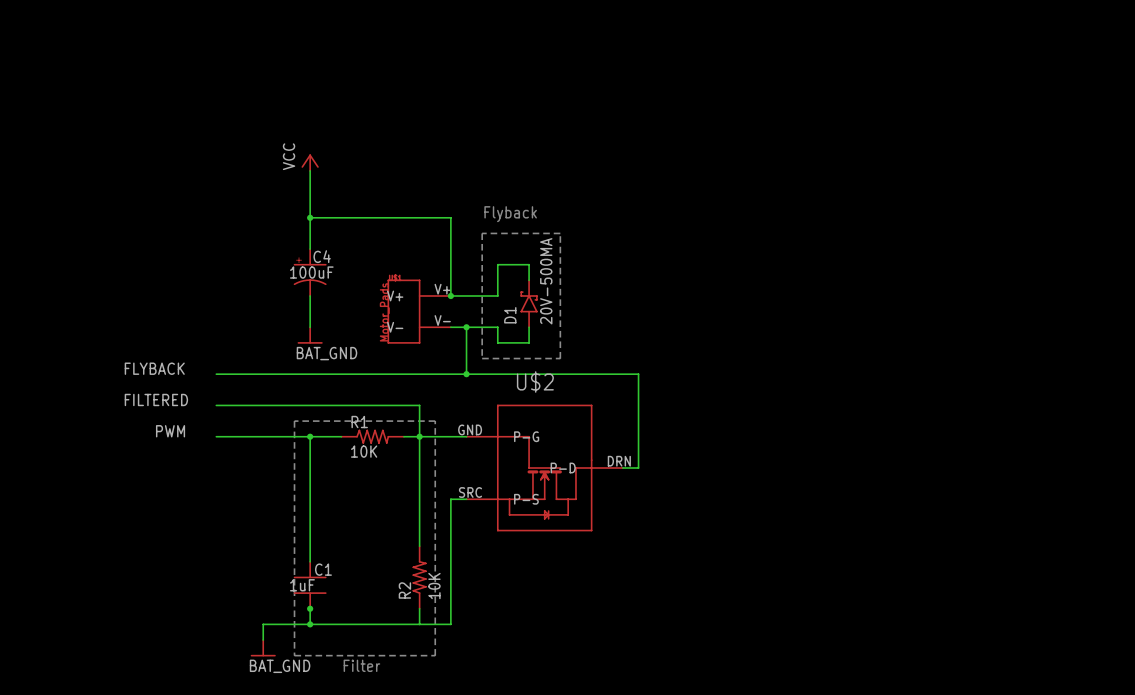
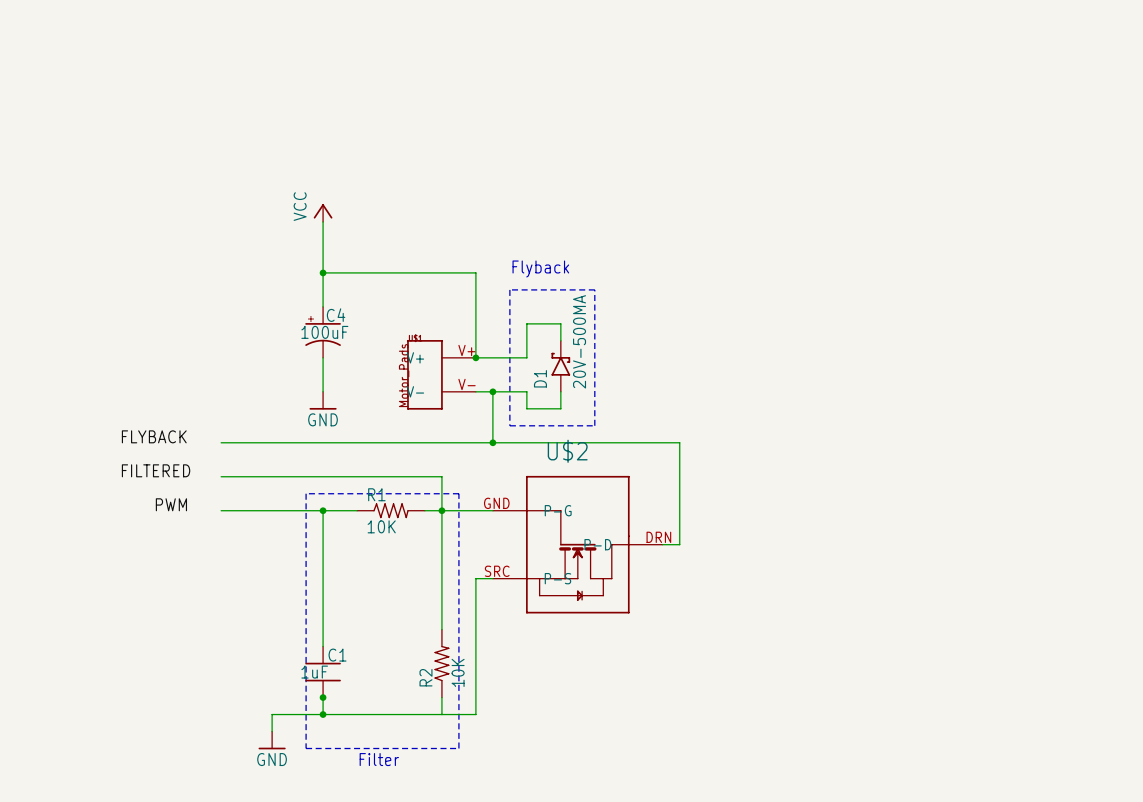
power symbol: BAT_GND (310, 335) -> GND (323, 400)
power symbol: BAT_GND (263, 648) -> GND (272, 740)

